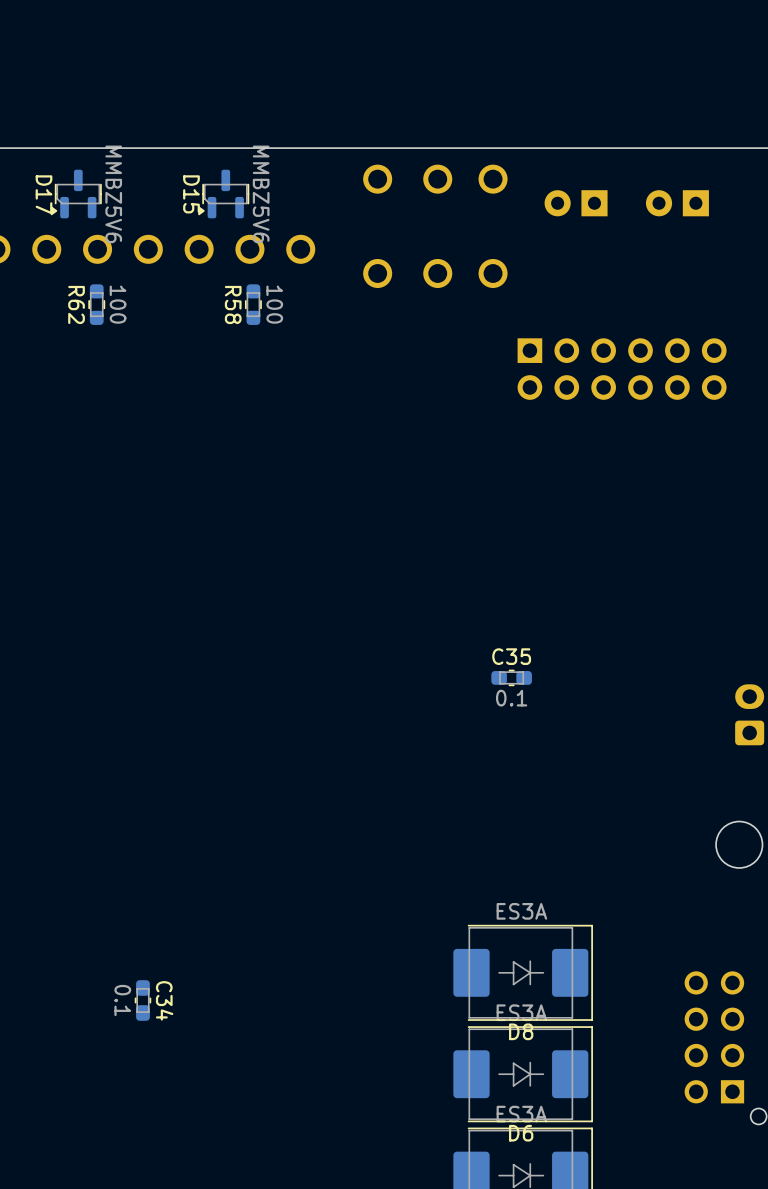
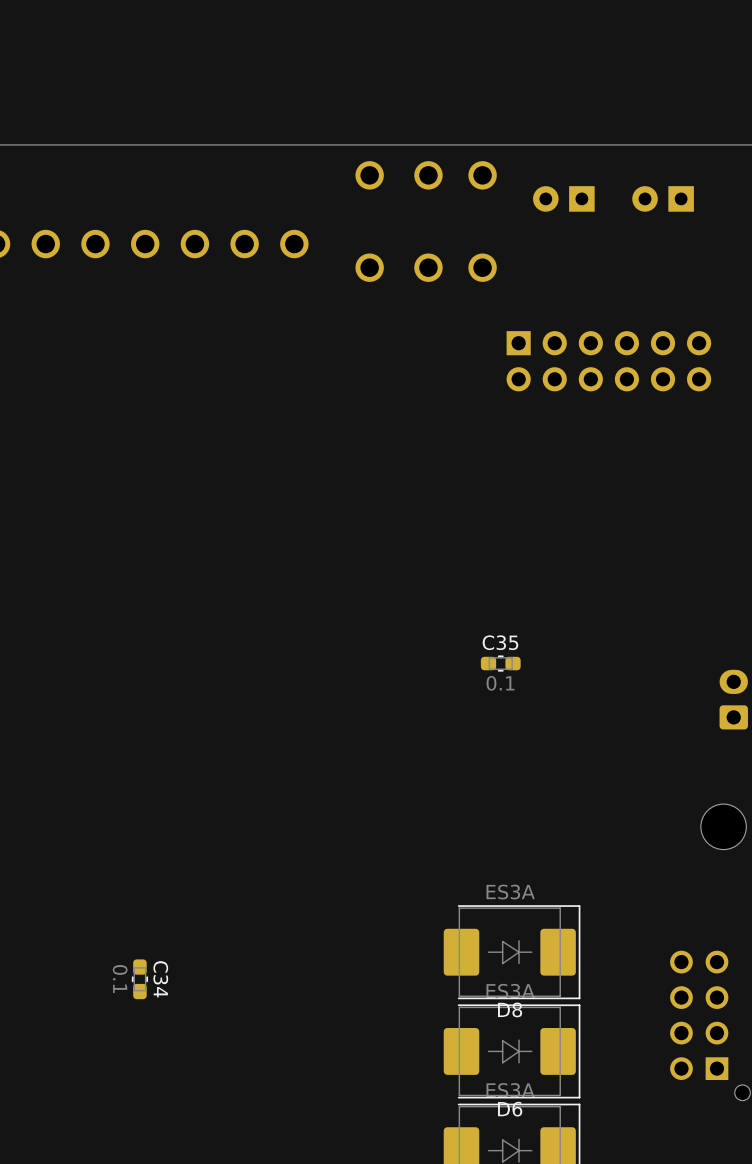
D17: MMBZ5V6 (76, 194) -> none
D15: MMBZ5V6 (223, 194) -> none
R62: 100 (96, 304) -> none
R58: 100 (253, 304) -> none

